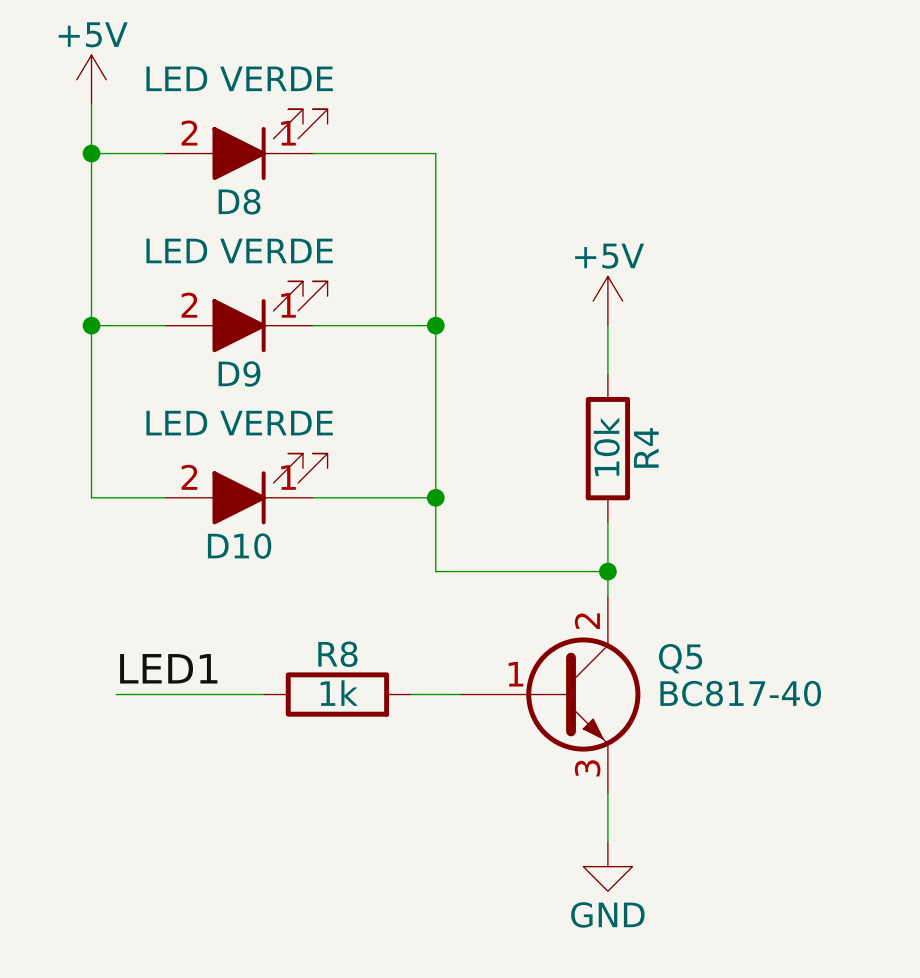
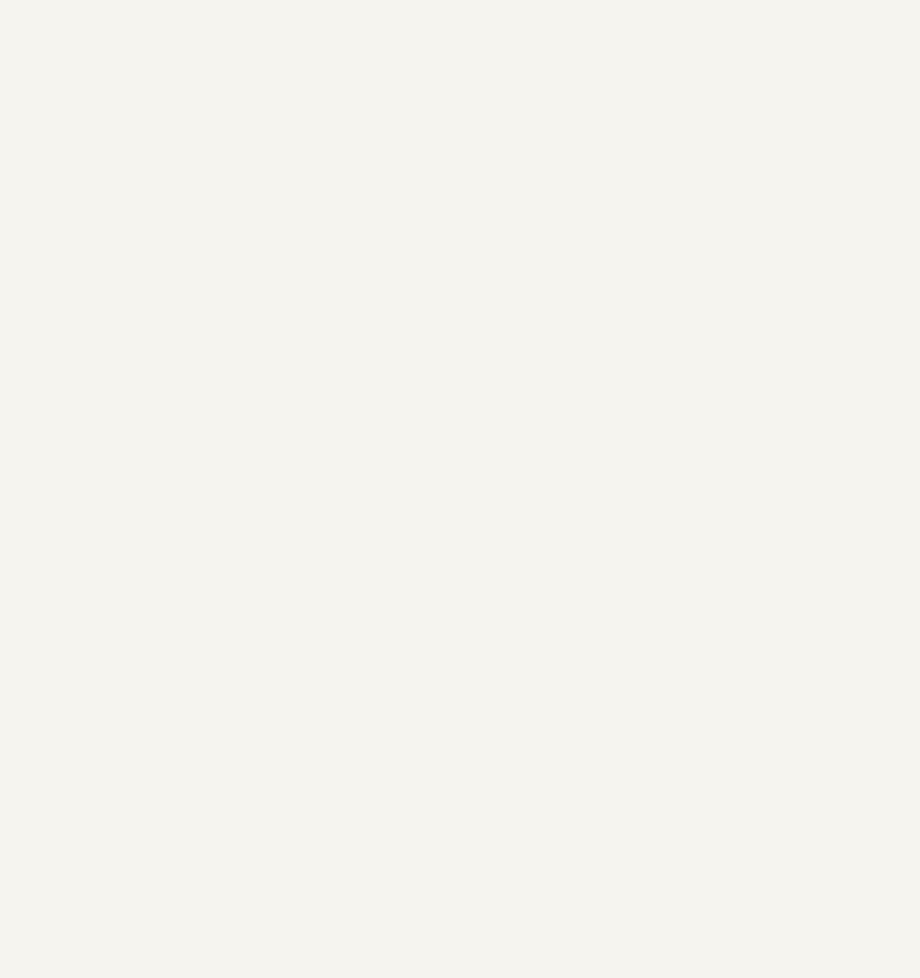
power symbol: +5V (91, 79) -> none
wire: (91, 104) (91, 497) (165, 497) -> none
D8: LED VERDE (246, 144) -> none
wire: (91, 153) (165, 153) -> none
junction: (91, 153) -> none
wire: (312, 153) (435, 153) (435, 571) (607, 571) -> none
power symbol: +5V (607, 301) -> none
D9: LED VERDE (246, 316) -> none
wire: (91, 325) (165, 325) -> none
junction: (91, 325) -> none
wire: (312, 325) (435, 325) -> none
junction: (435, 325) -> none
wire: (607, 325) (607, 374) -> none
R4: 10k (607, 448) -> none
D10: LED VERDE (246, 488) -> none
wire: (312, 497) (435, 497) -> none
junction: (435, 497) -> none
wire: (607, 522) (607, 596) -> none
junction: (607, 571) -> none
label: LED1 (168, 668) -> none
wire: (116, 694) (263, 694) -> none
R8: 1k (337, 694) -> none
wire: (411, 694) (460, 694) -> none
Q5: BC817-40 (550, 694) -> none
wire: (607, 792) (607, 842) -> none
power symbol: GND (607, 866) -> none

